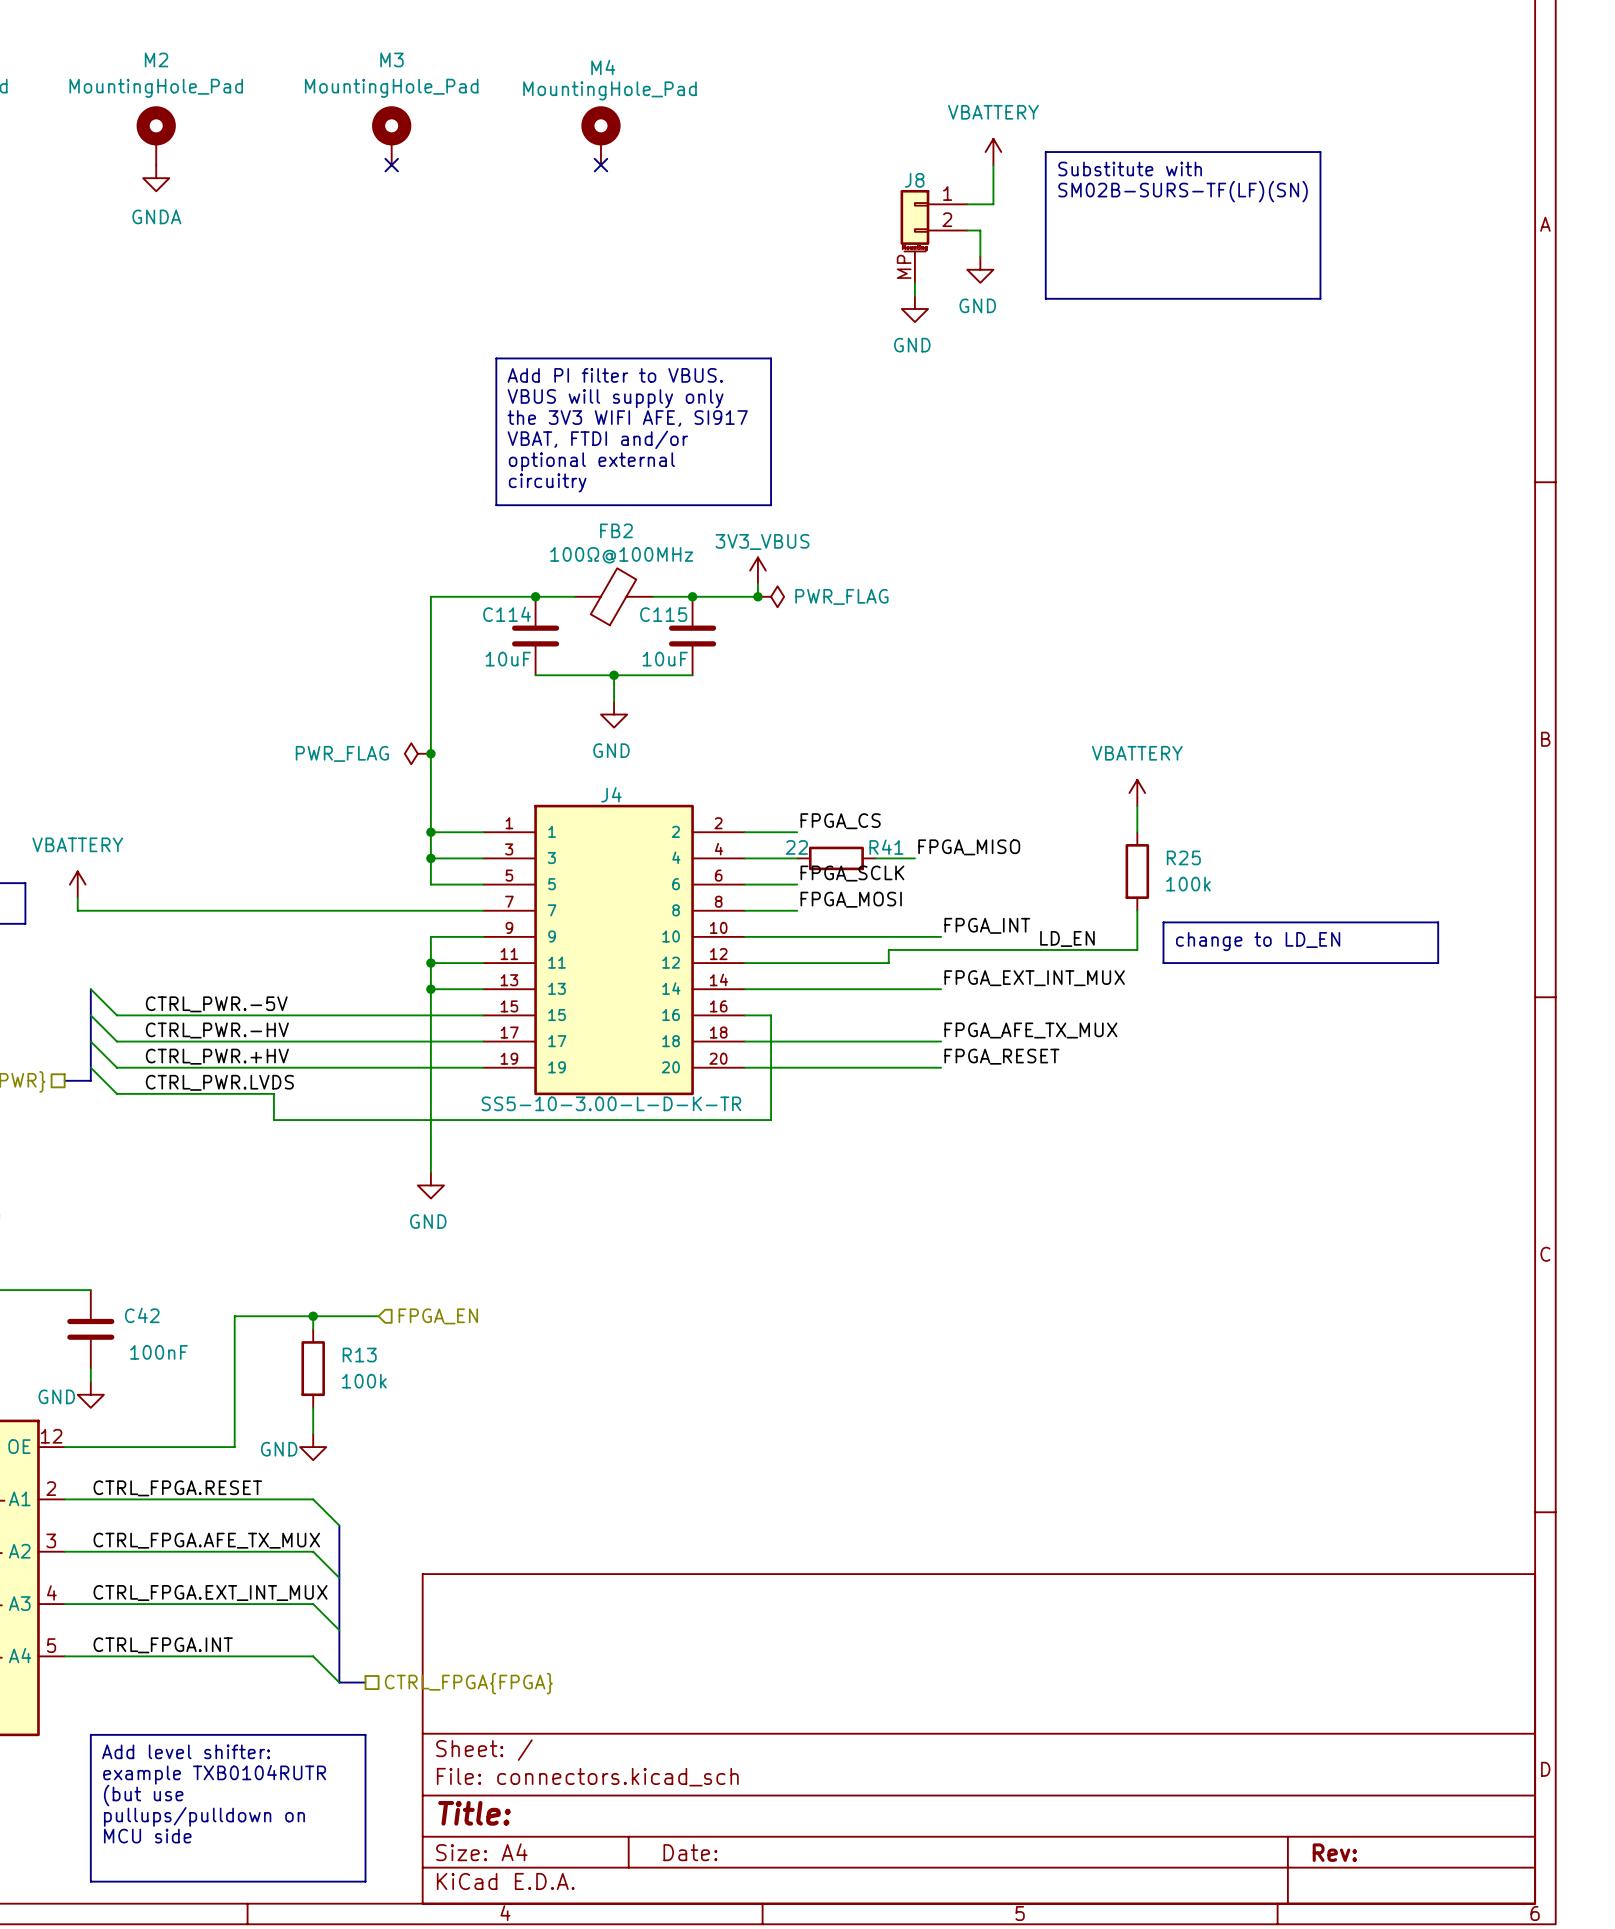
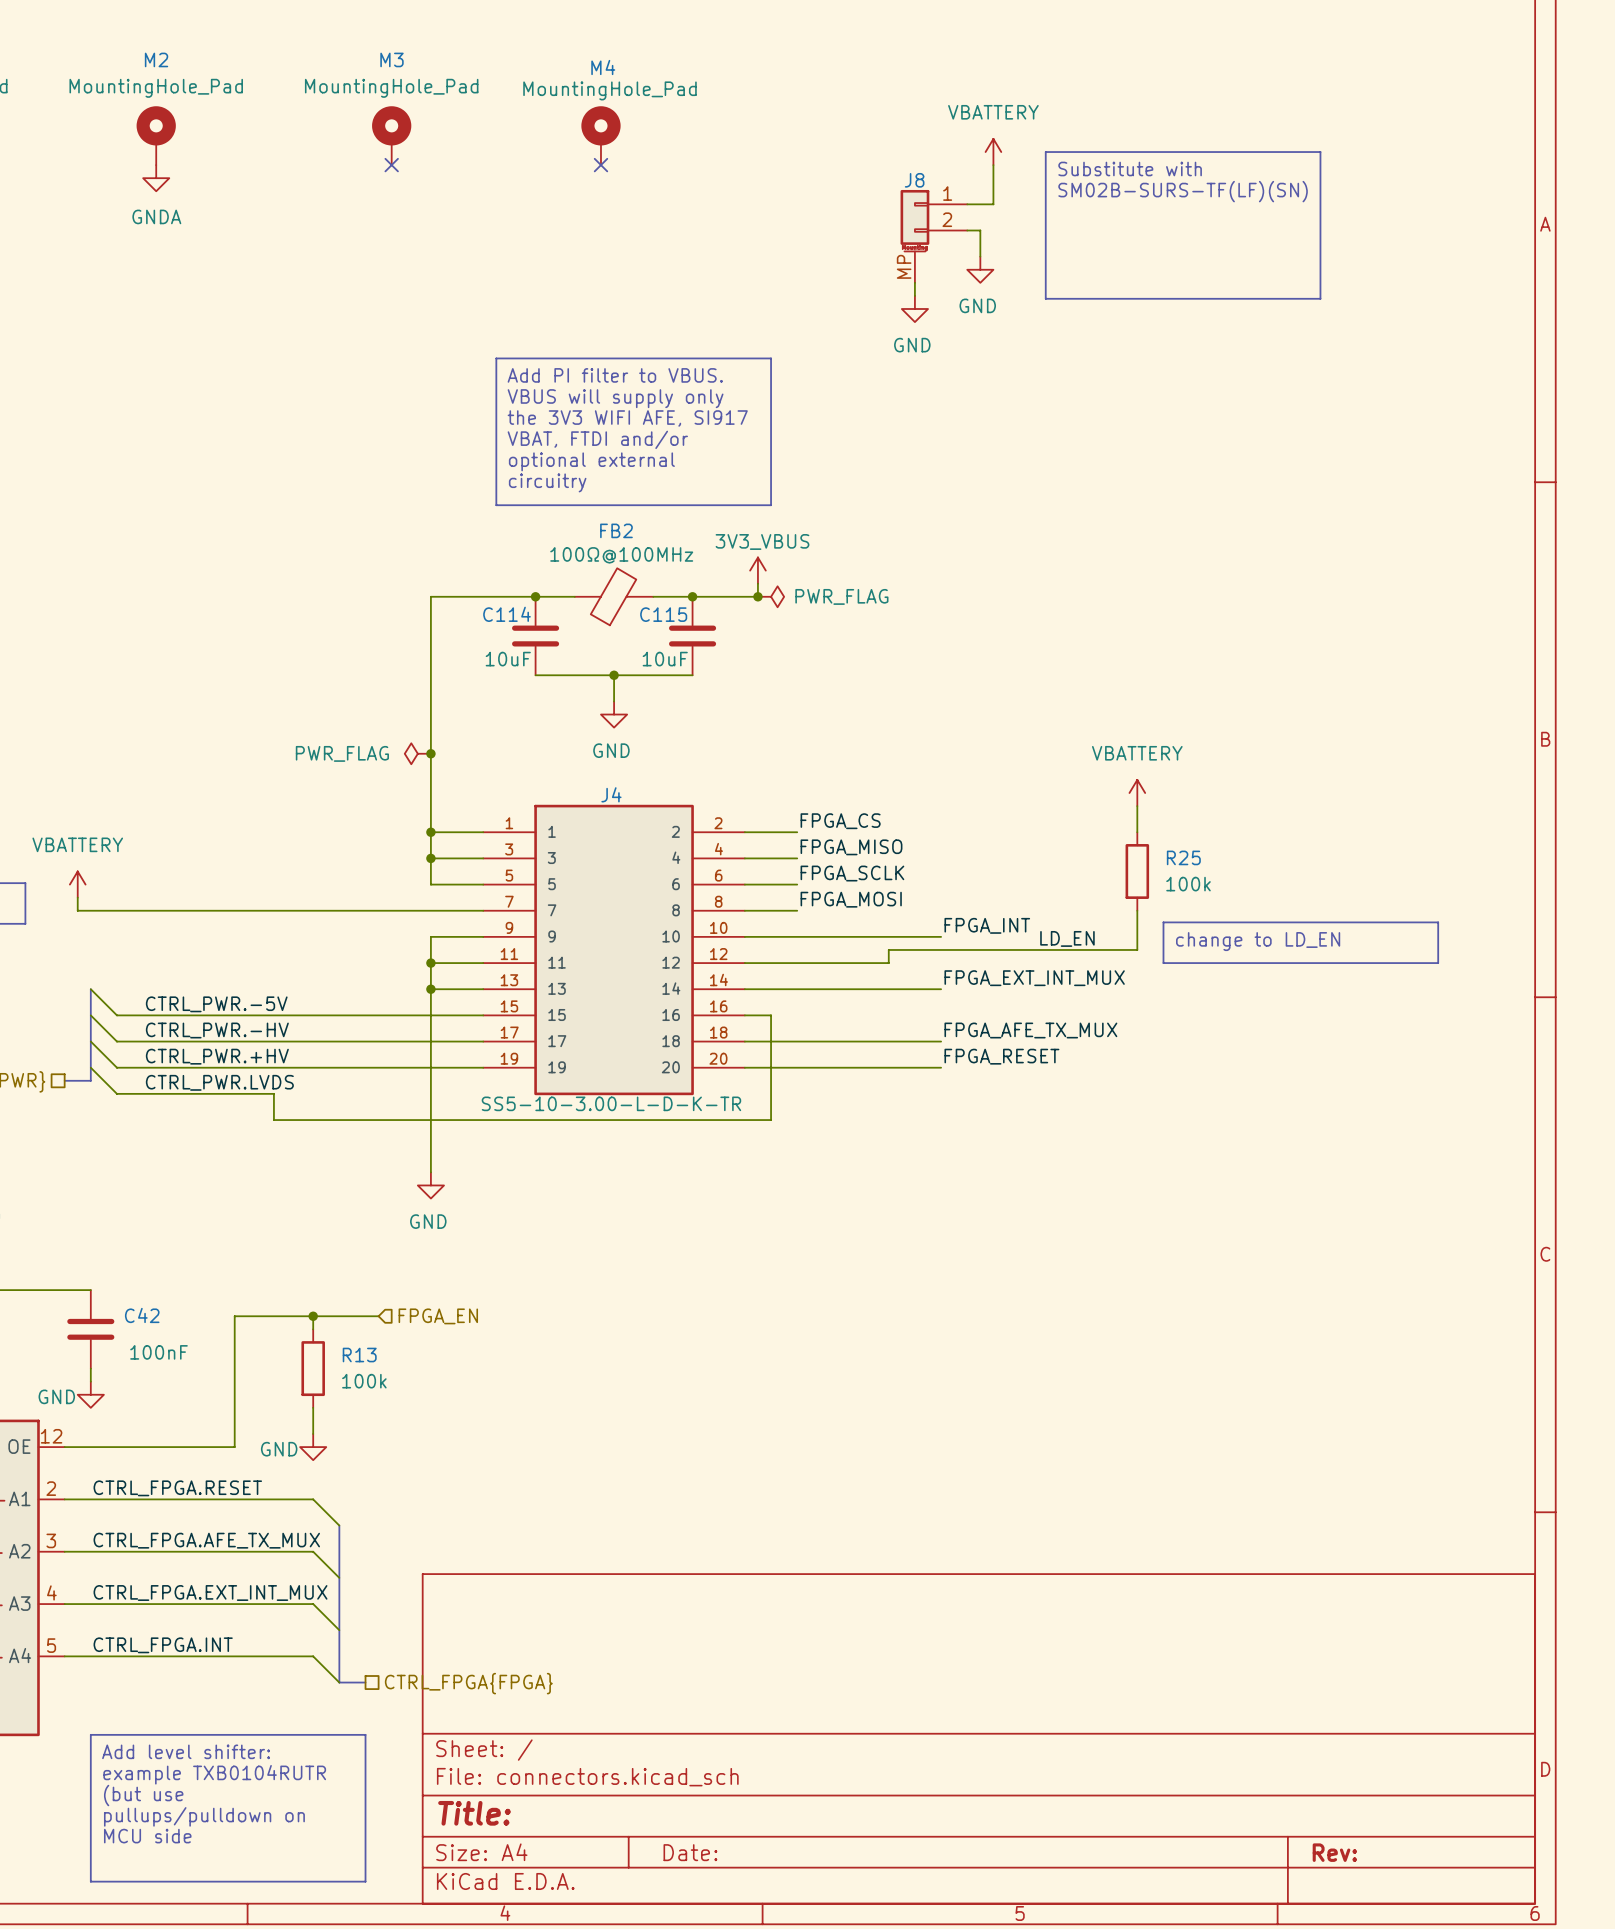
label position: FPGA_MISO (969, 847) -> FPGA_MISO (851, 847)
R41: 22 (836, 858) -> none
wire: (875, 858) (914, 858) -> none

